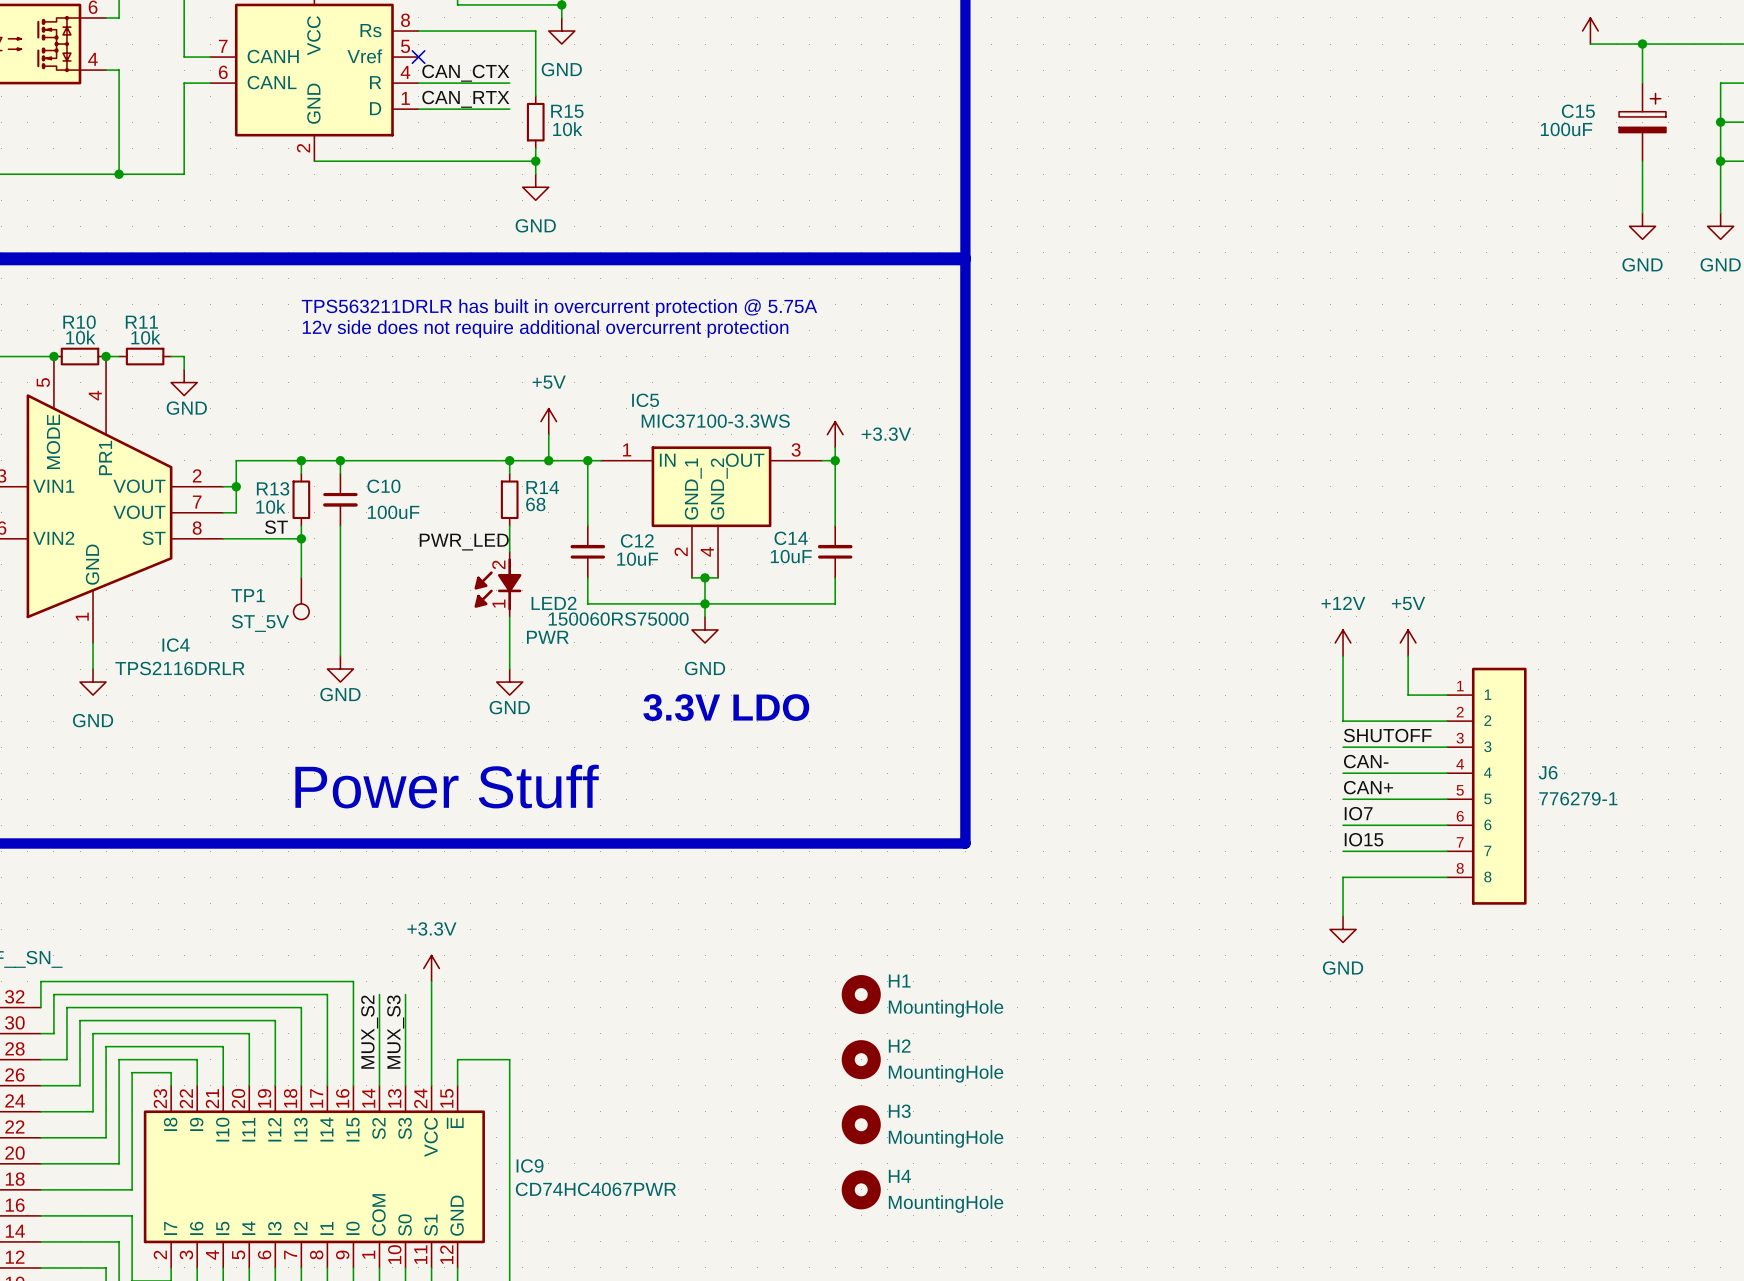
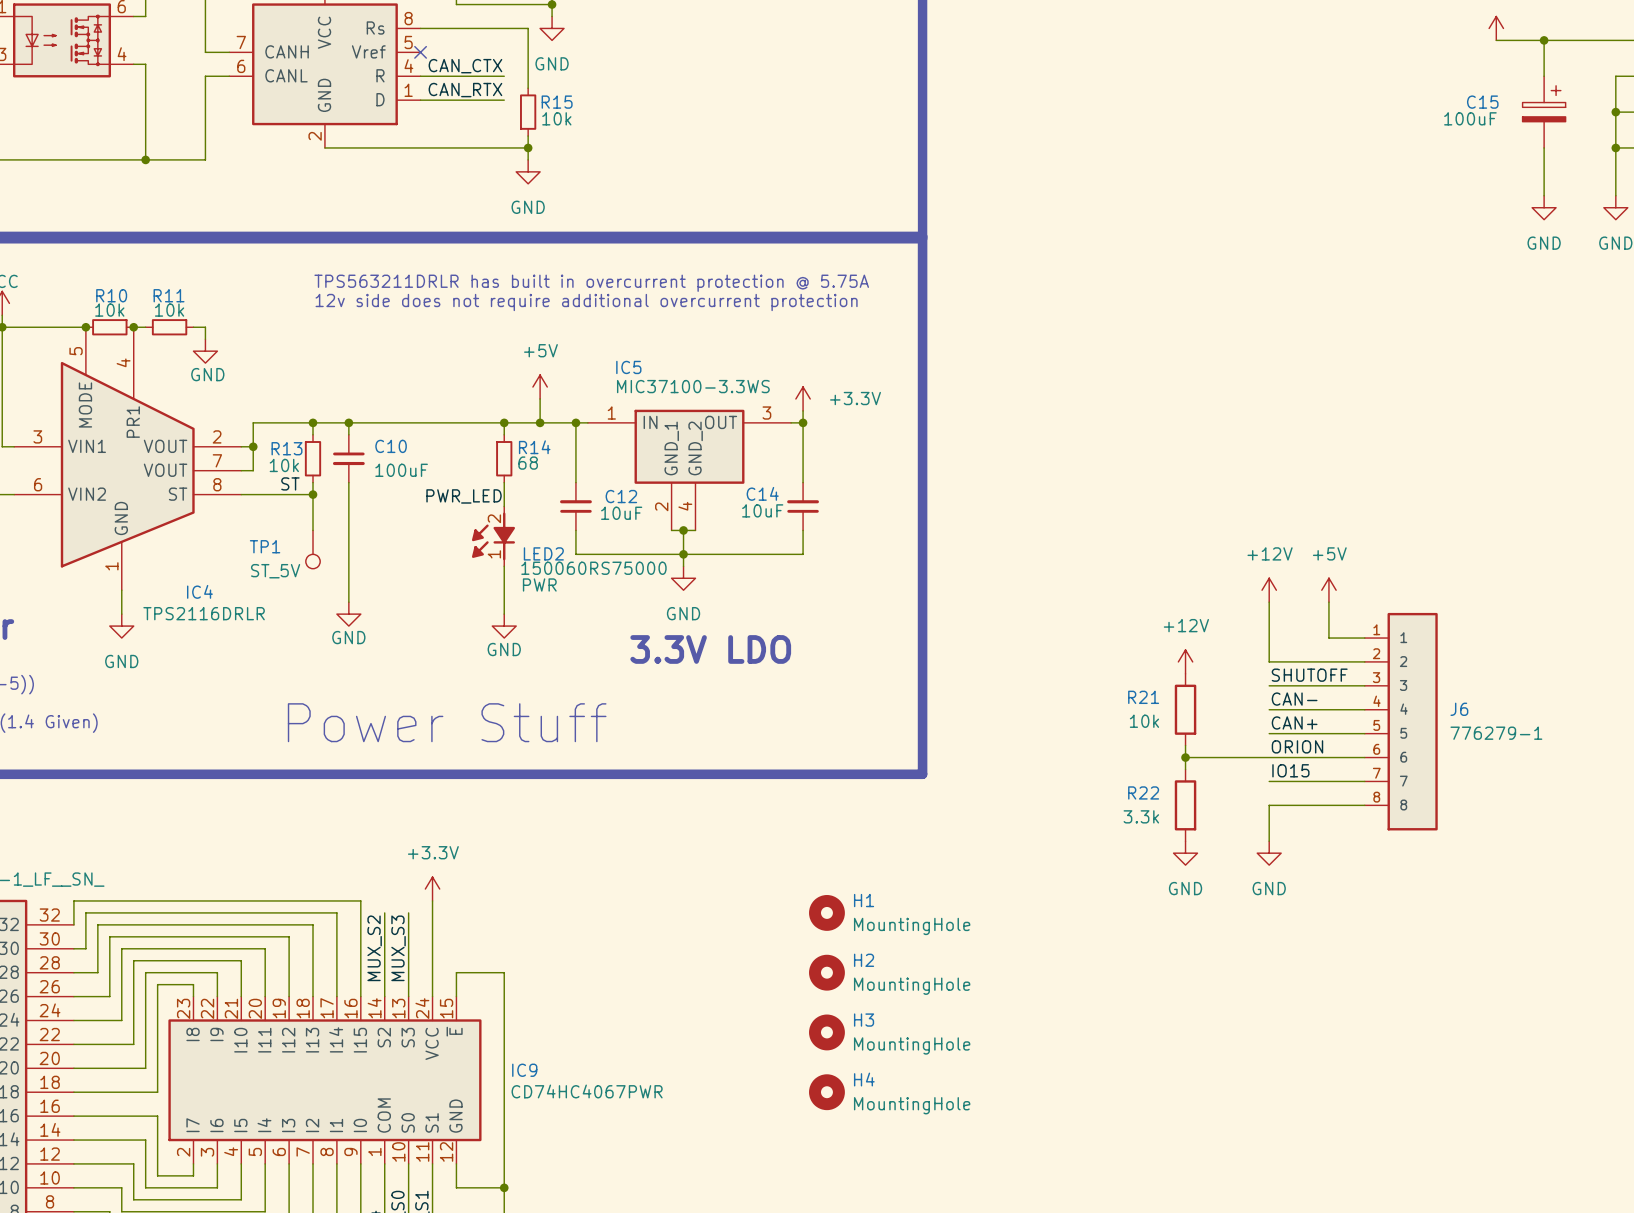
power symbol: none -> +12V (1185, 661)
R21: none -> 10k (1185, 709)
wire: none -> (1185, 745) (1185, 769)
label: IO7 (1358, 813) -> ORION (1297, 746)
wire: none -> (1185, 757) (1269, 757)
junction: none -> (1185, 757)
R22: none -> 3.3k (1185, 805)
power symbol: none -> GND (1185, 853)

